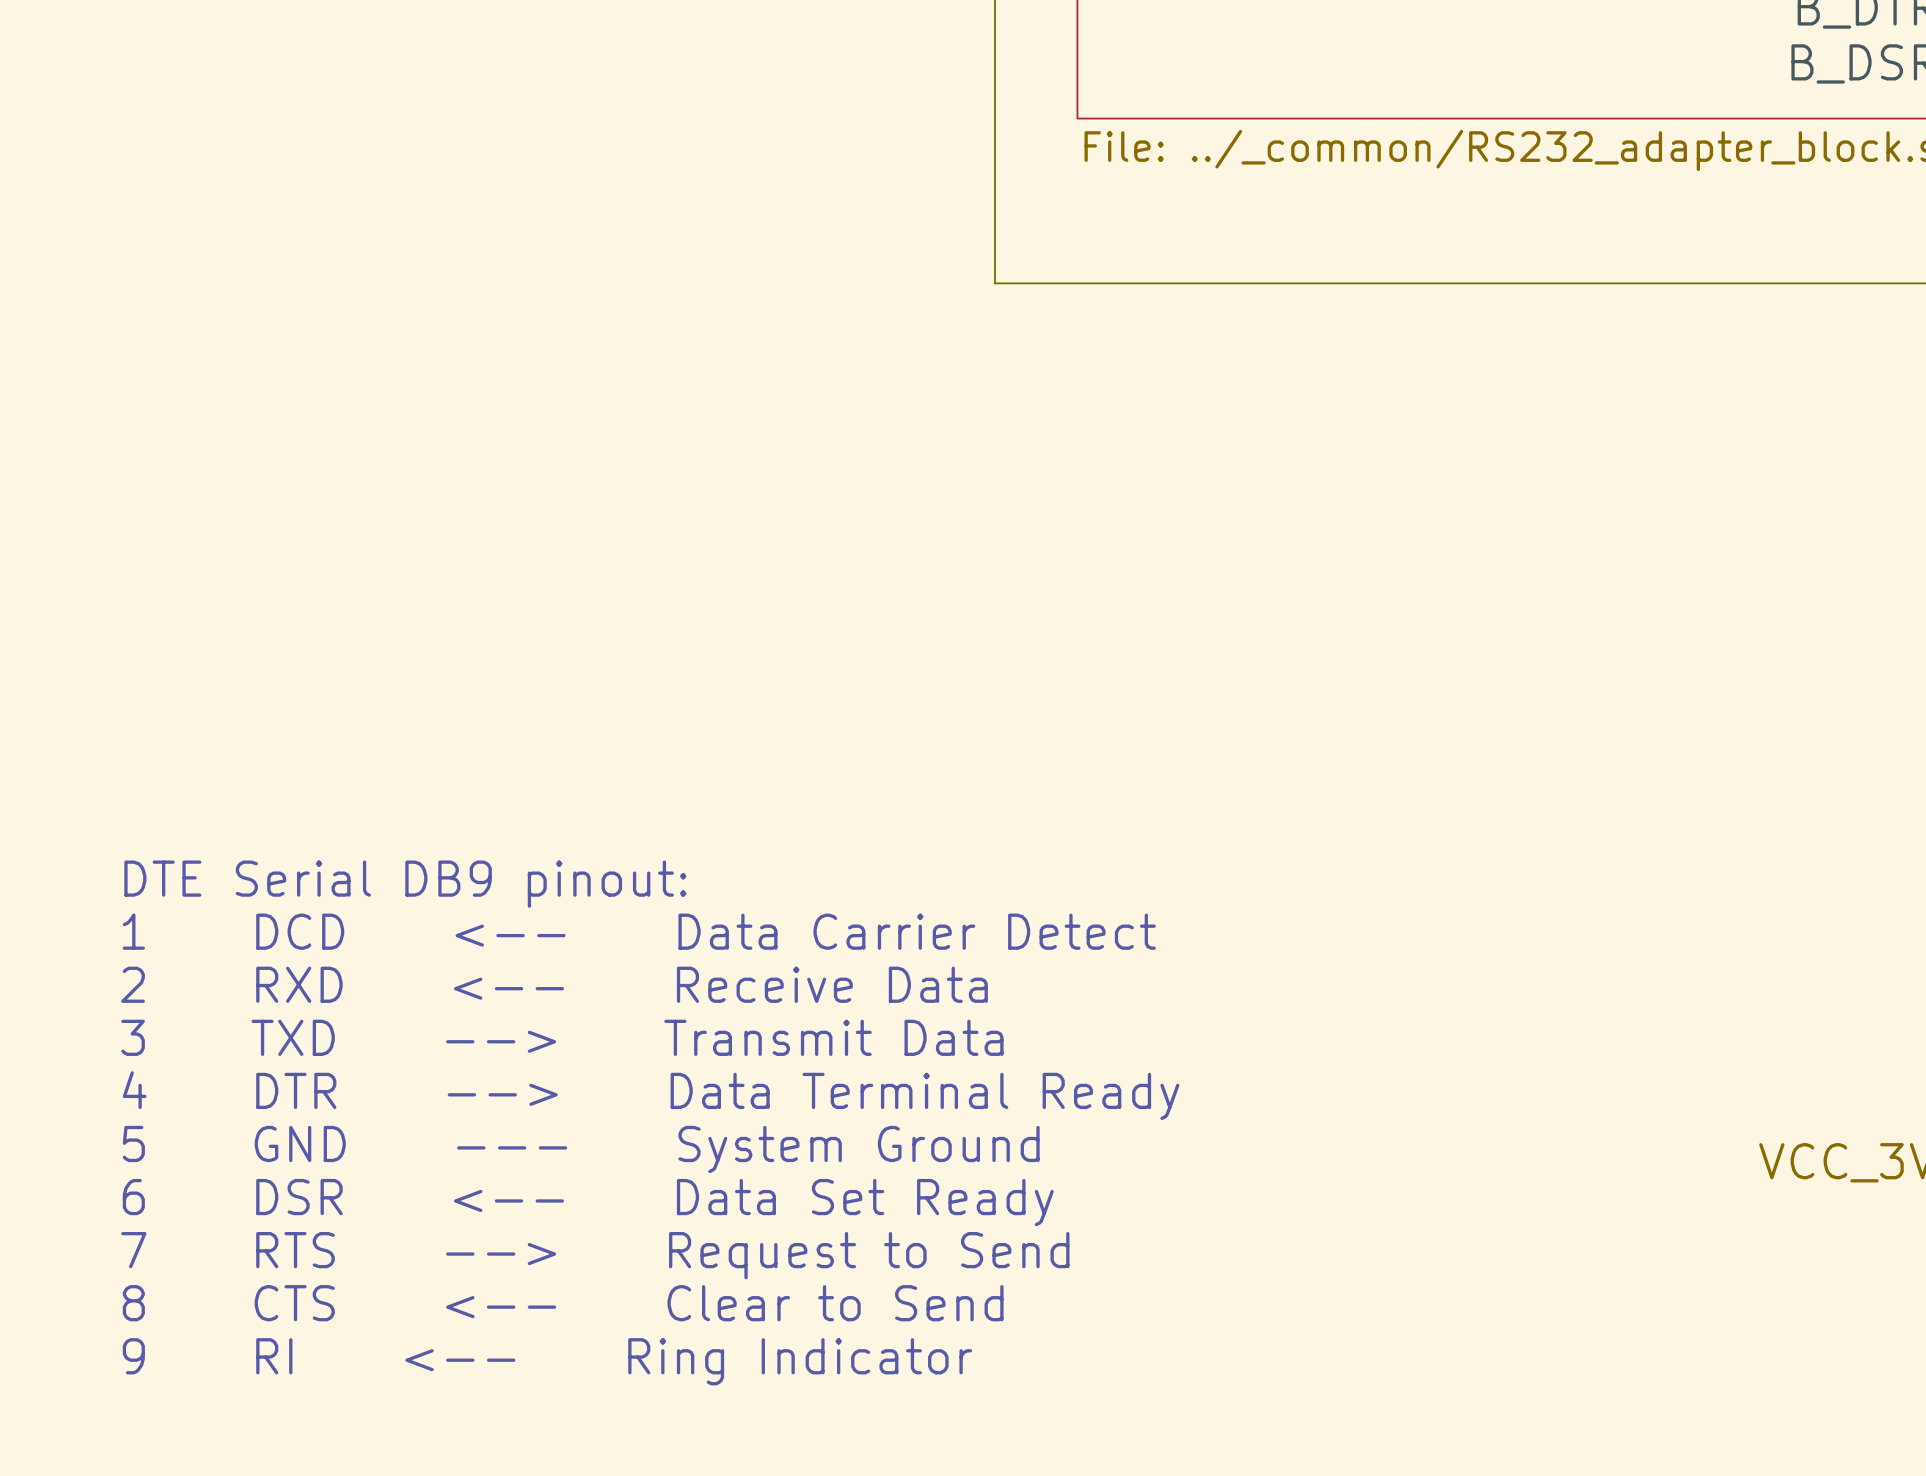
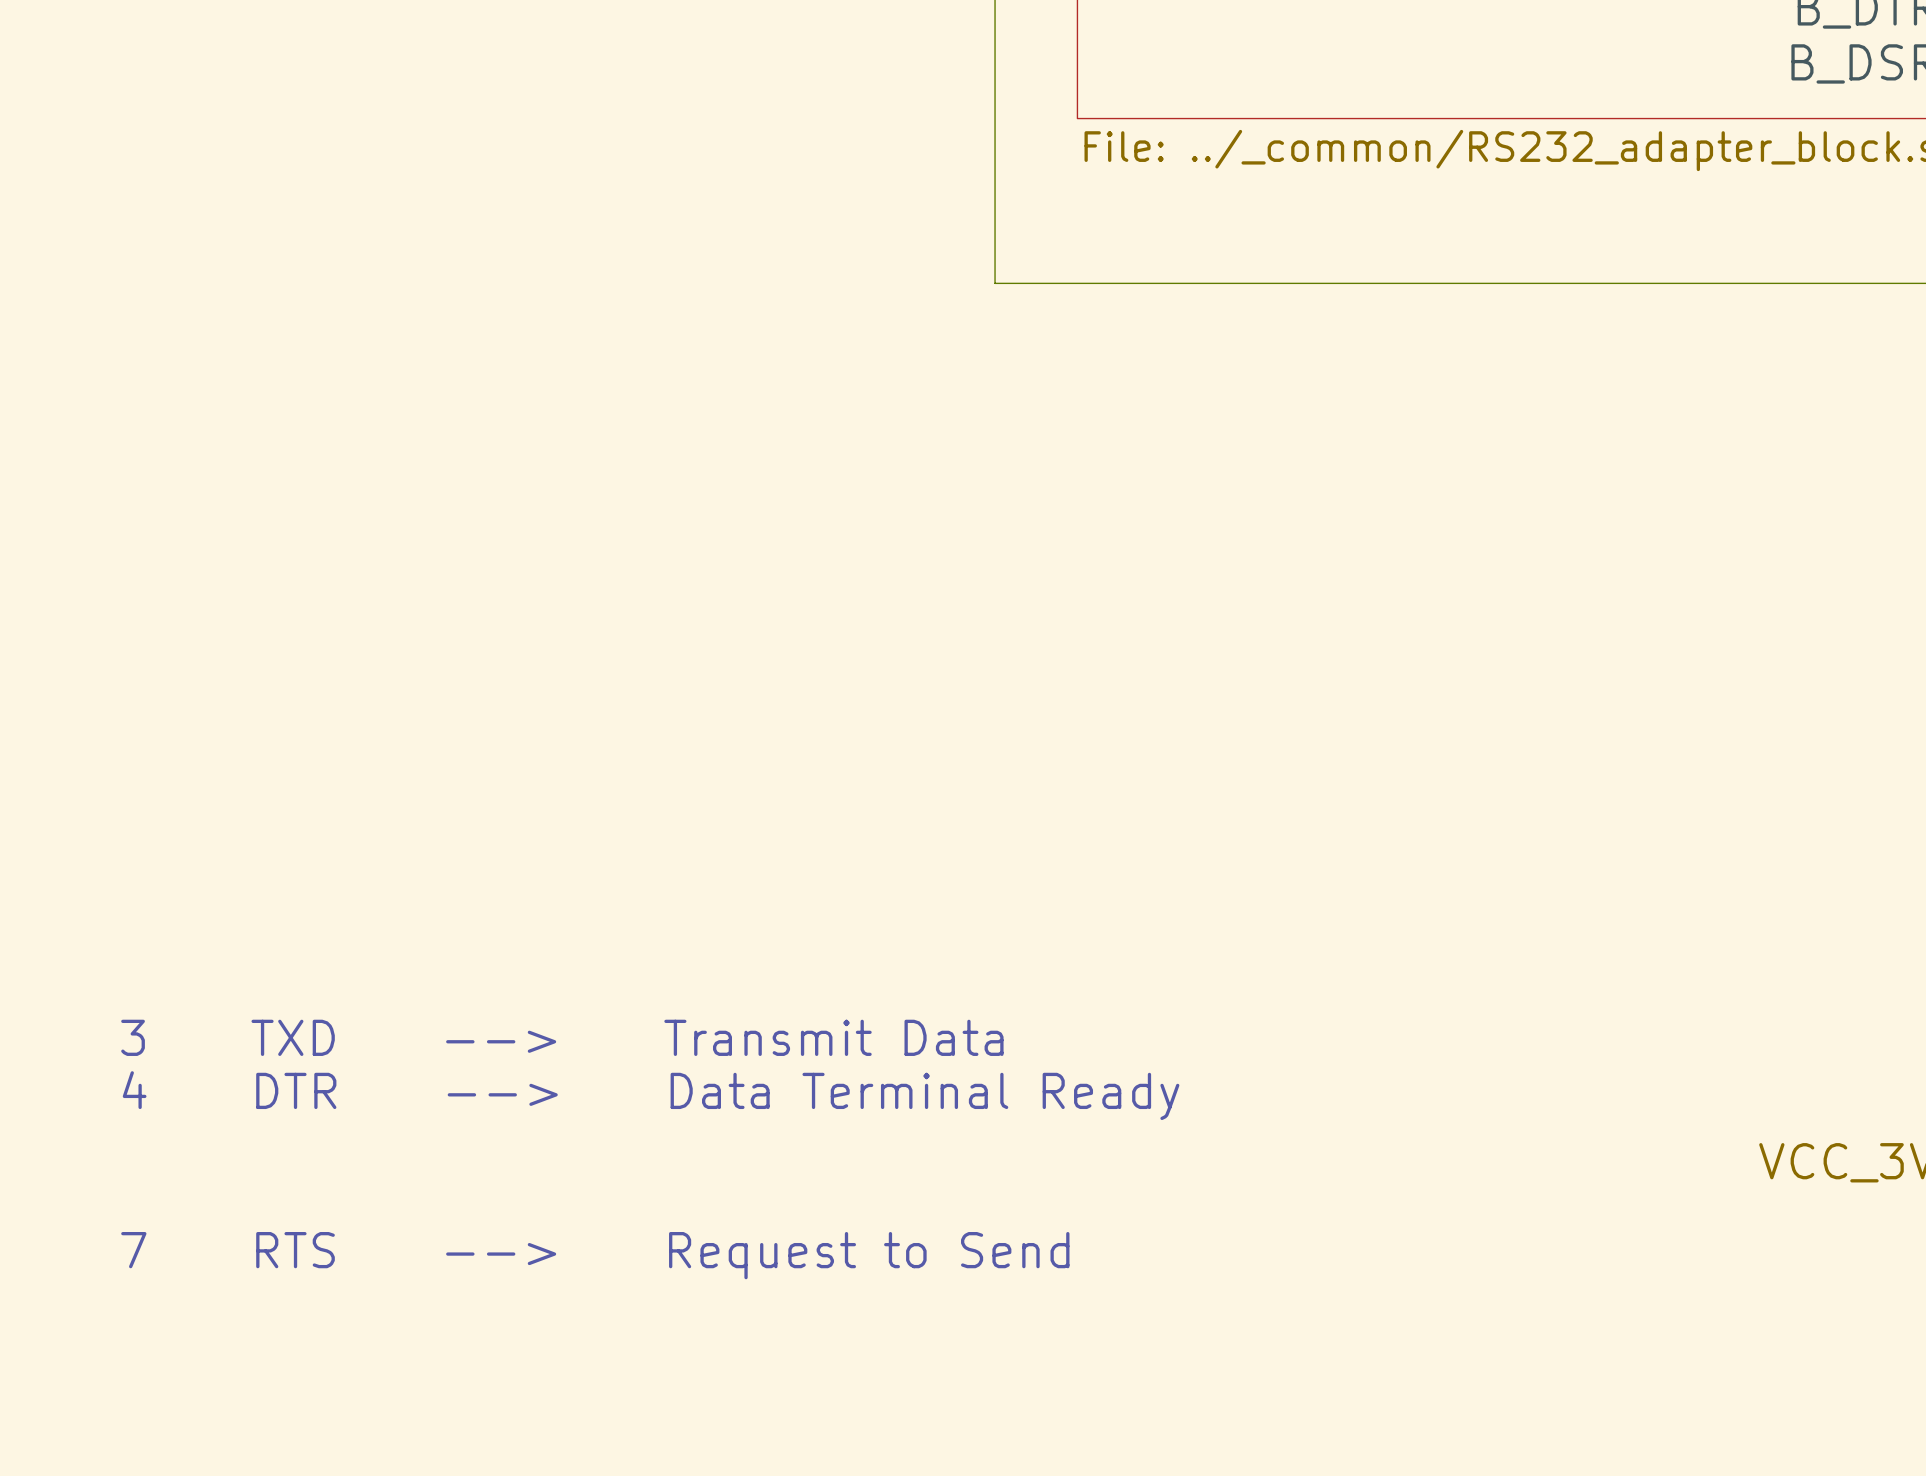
text: DTE Serial DB9 pinout: (405, 884) -> none
text: 1 DCD <-- Data Carrier Detect (639, 931) -> none
text: 2 RXD <-- Receive Data (554, 984) -> none
text: 5 GND --- System Ground (581, 1149) -> none
text: 6 DSR <-- Data Set Ready (588, 1202) -> none
text: 8 CTS <-- Clear to Send (563, 1303) -> none
text: 9 RI <-- Ring Indicator (547, 1361) -> none

